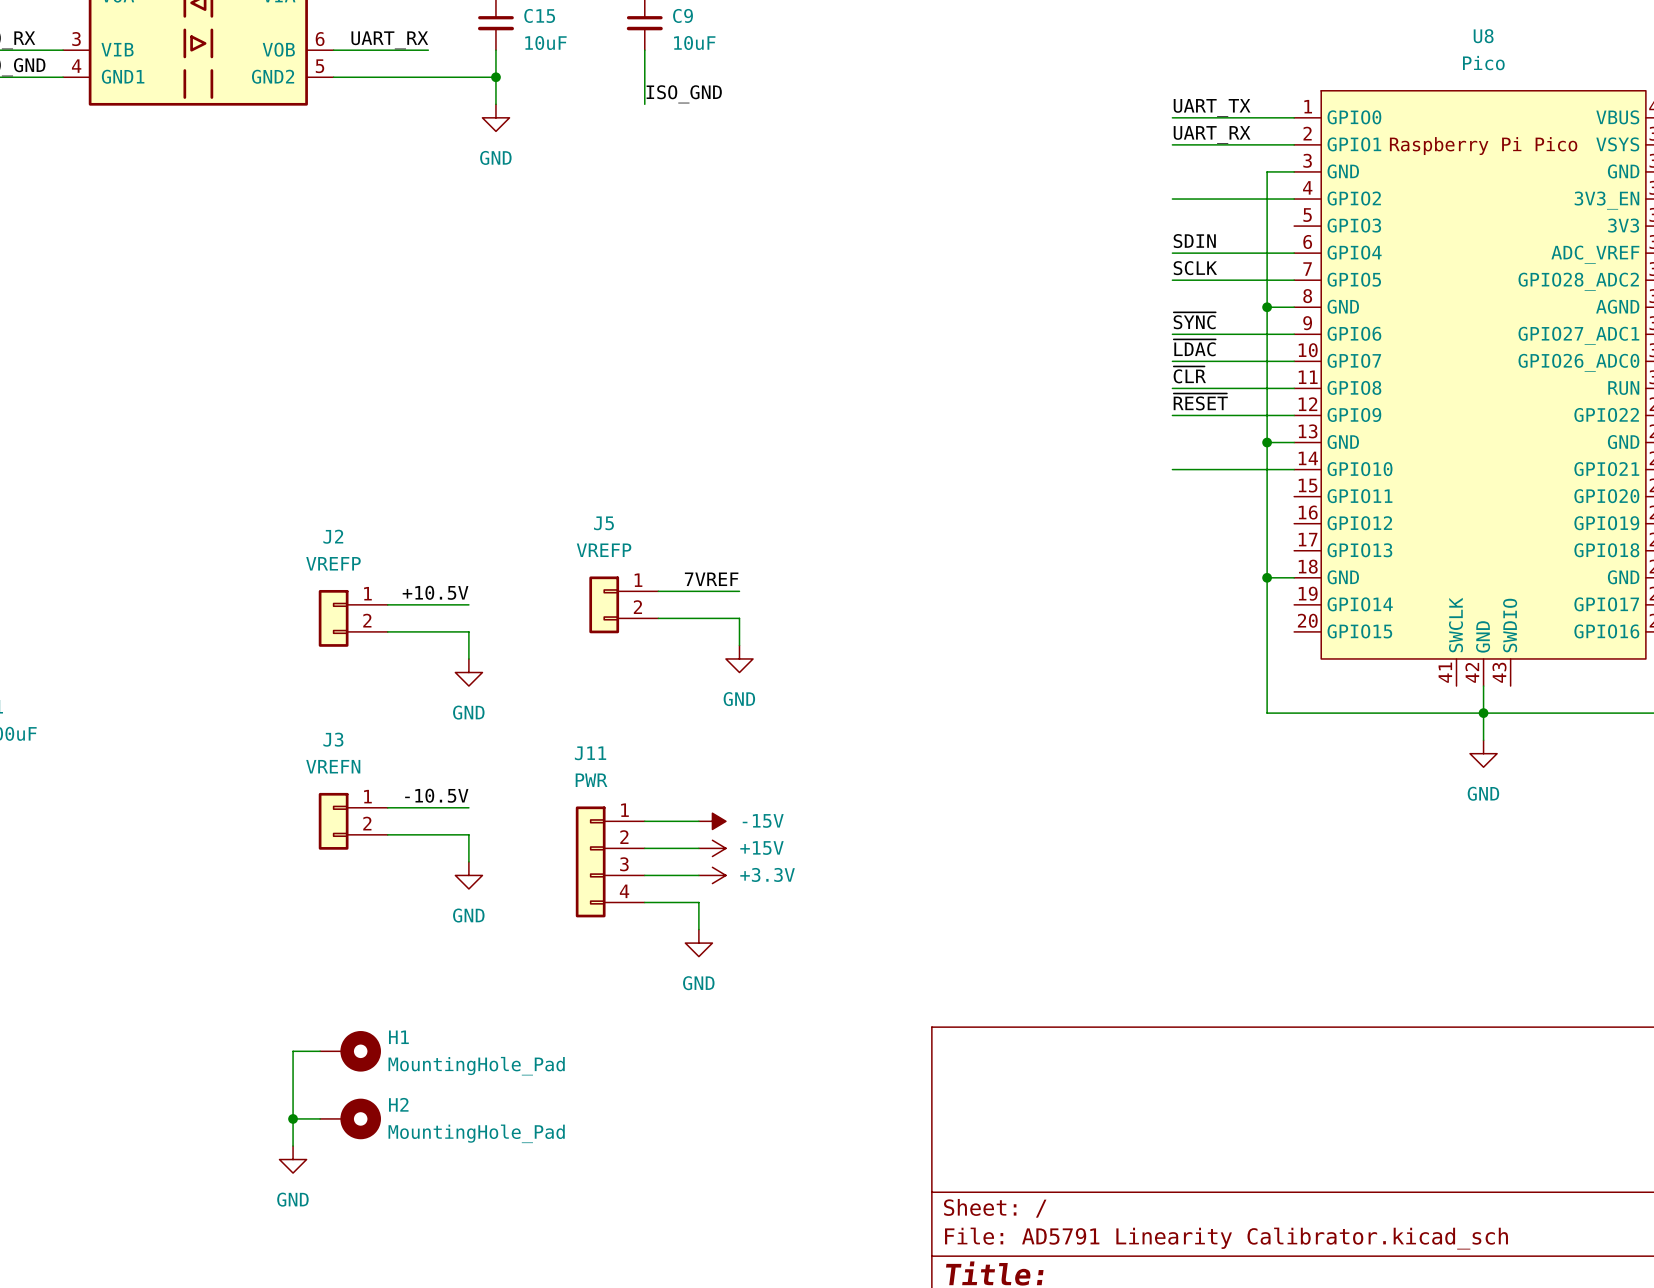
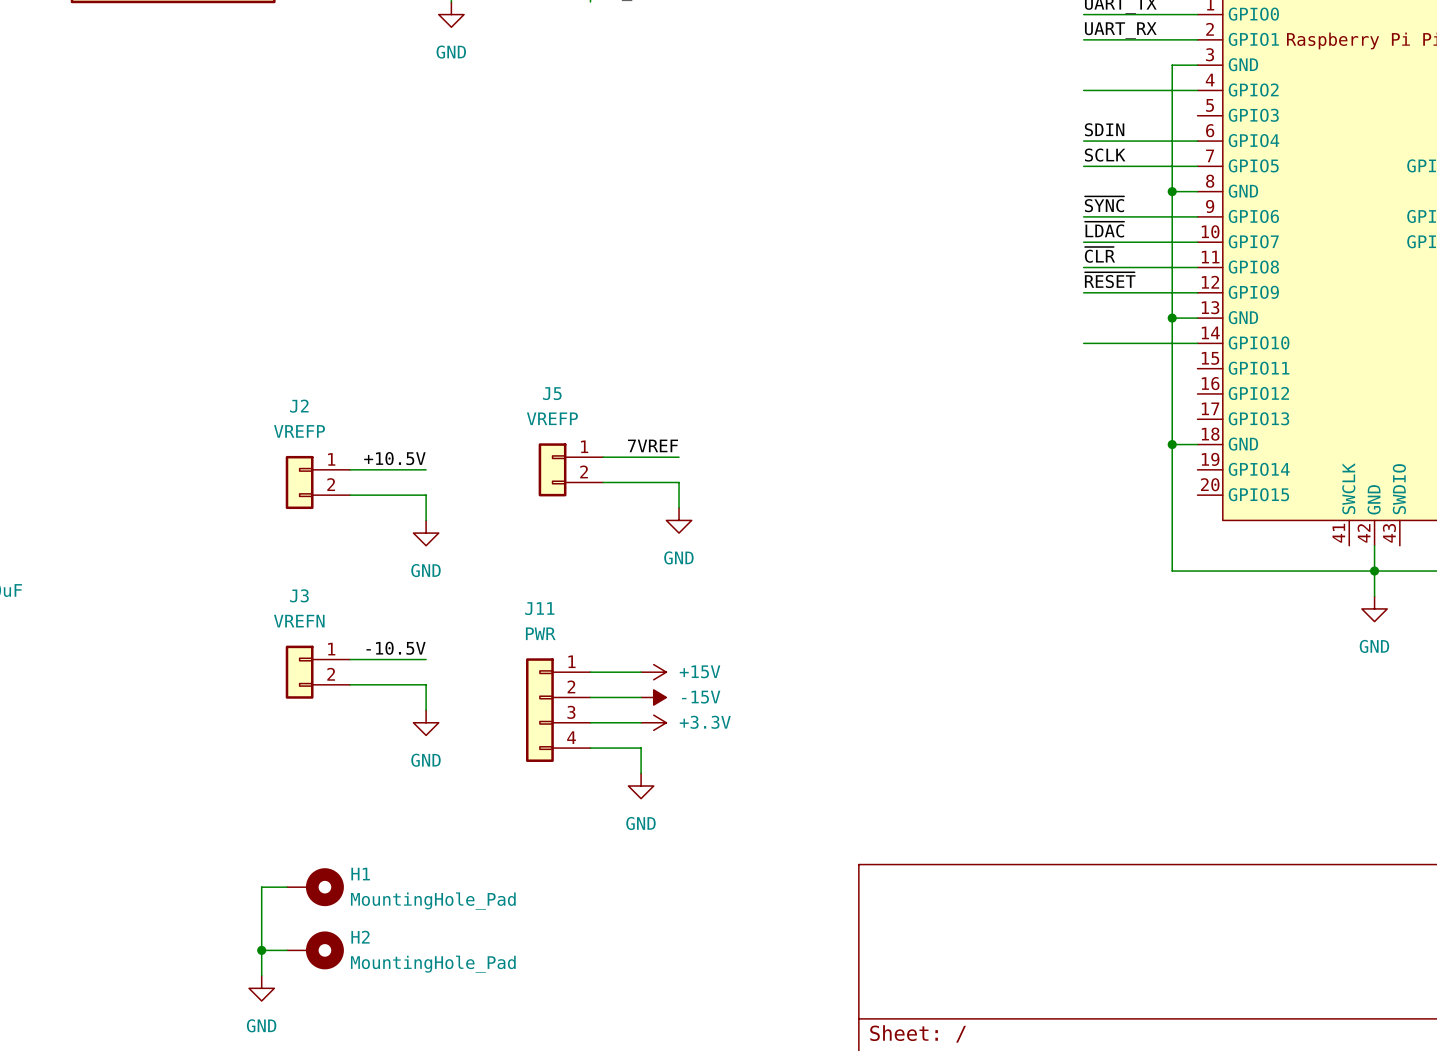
power symbol: -15V (712, 821) -> +15V (653, 672)
power symbol: +15V (712, 848) -> -15V (653, 697)

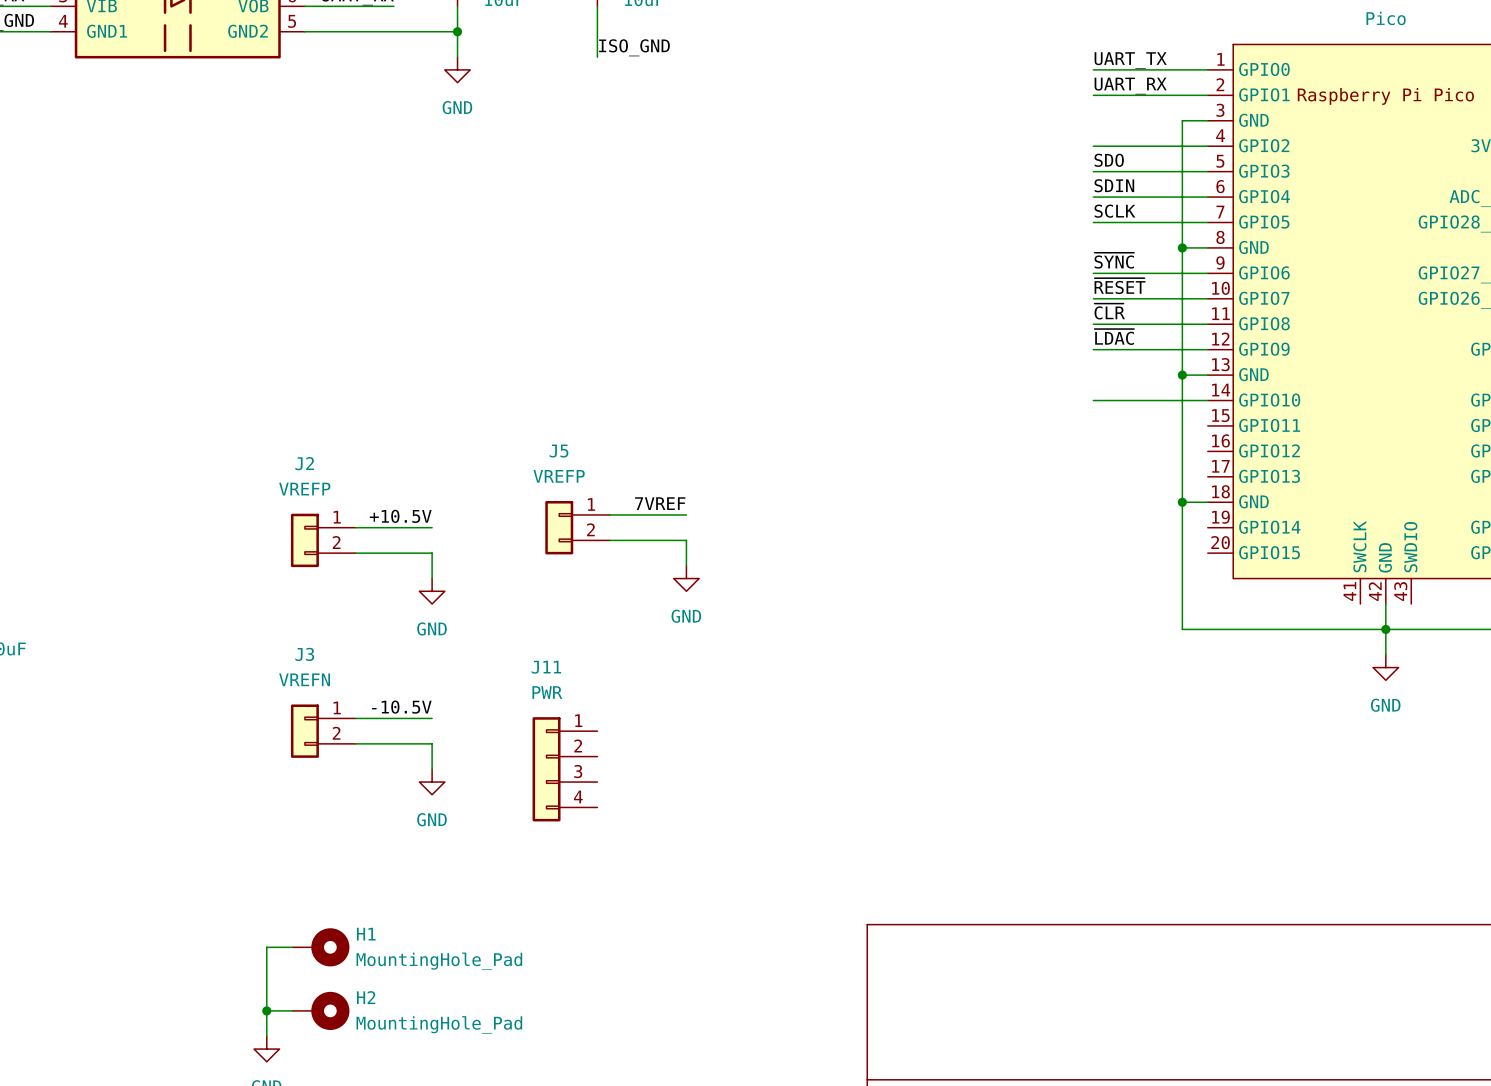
label: none -> SDO (1109, 160)
wire: none -> (1093, 171) (1207, 171)
label: ~{LDAC} (1104, 229) -> ~{RESET} (1120, 286)
label: ~{RESET} (1110, 280) -> ~{LDAC} (1114, 336)
wire: (590, 672) (641, 672) -> none
power symbol: +15V (653, 672) -> none
wire: (590, 697) (641, 697) -> none
power symbol: -15V (653, 697) -> none
wire: (590, 722) (641, 722) -> none
power symbol: +3.3V (653, 722) -> none
wire: (590, 748) (641, 748) (641, 773) -> none
power symbol: GND (641, 786) -> none

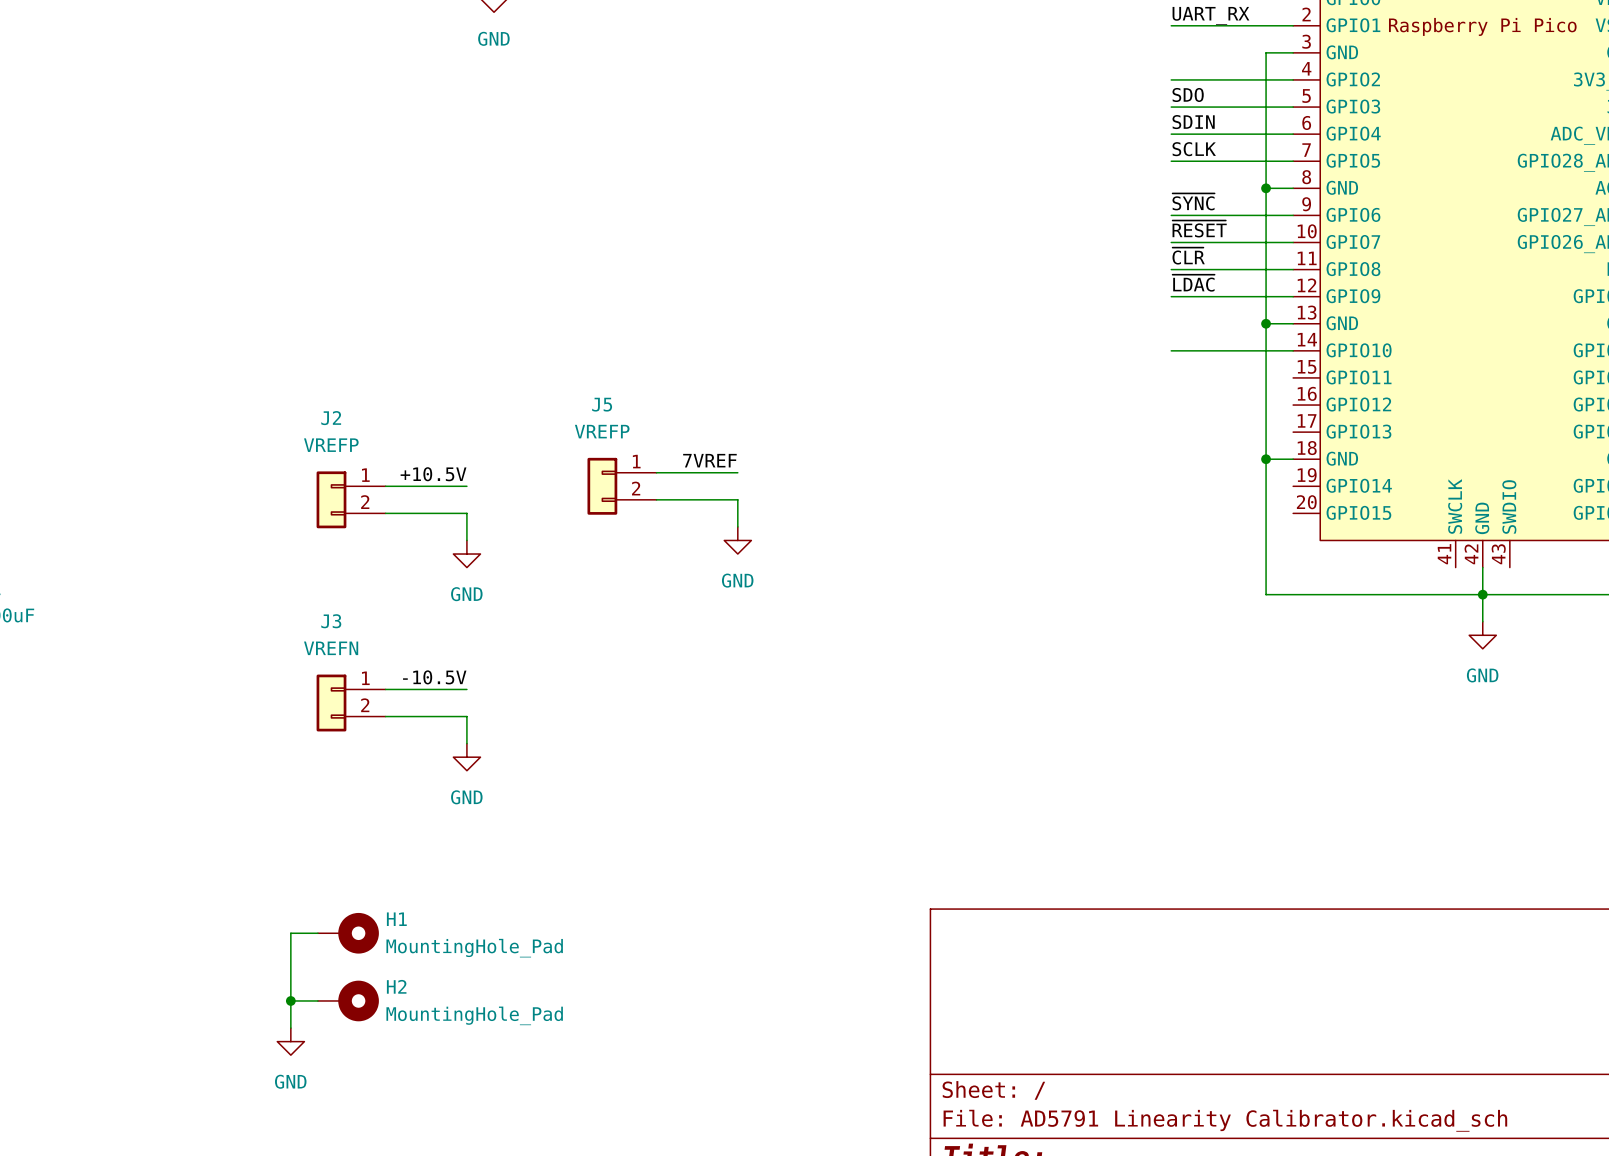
J11: PWR (564, 769) -> none

